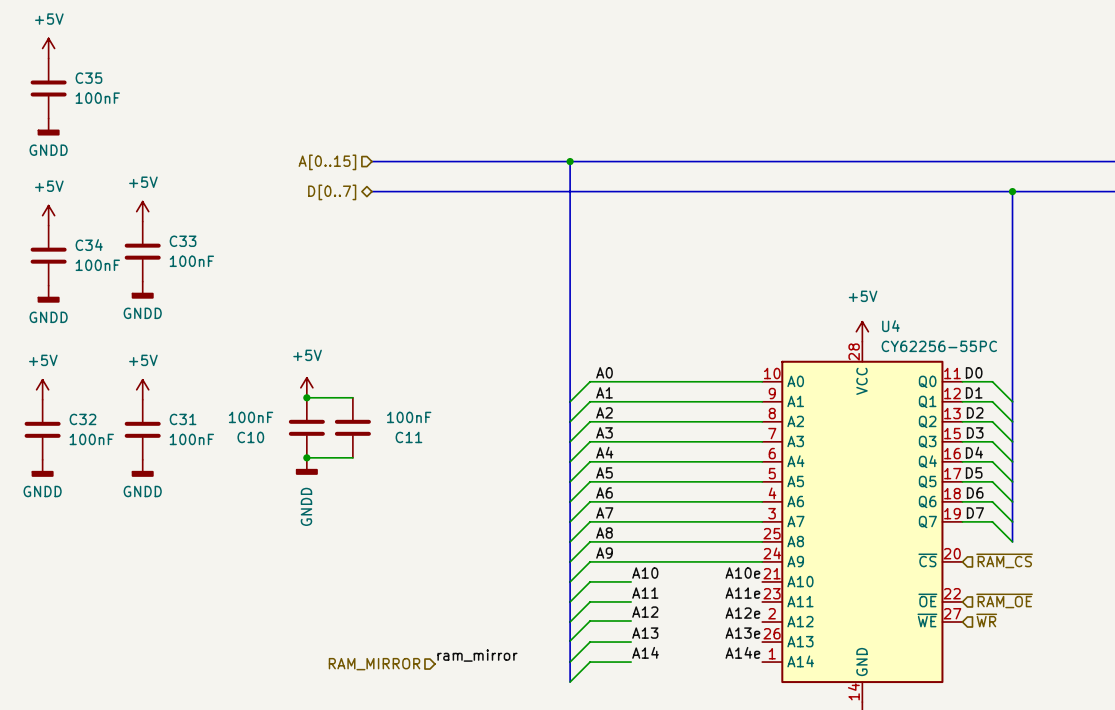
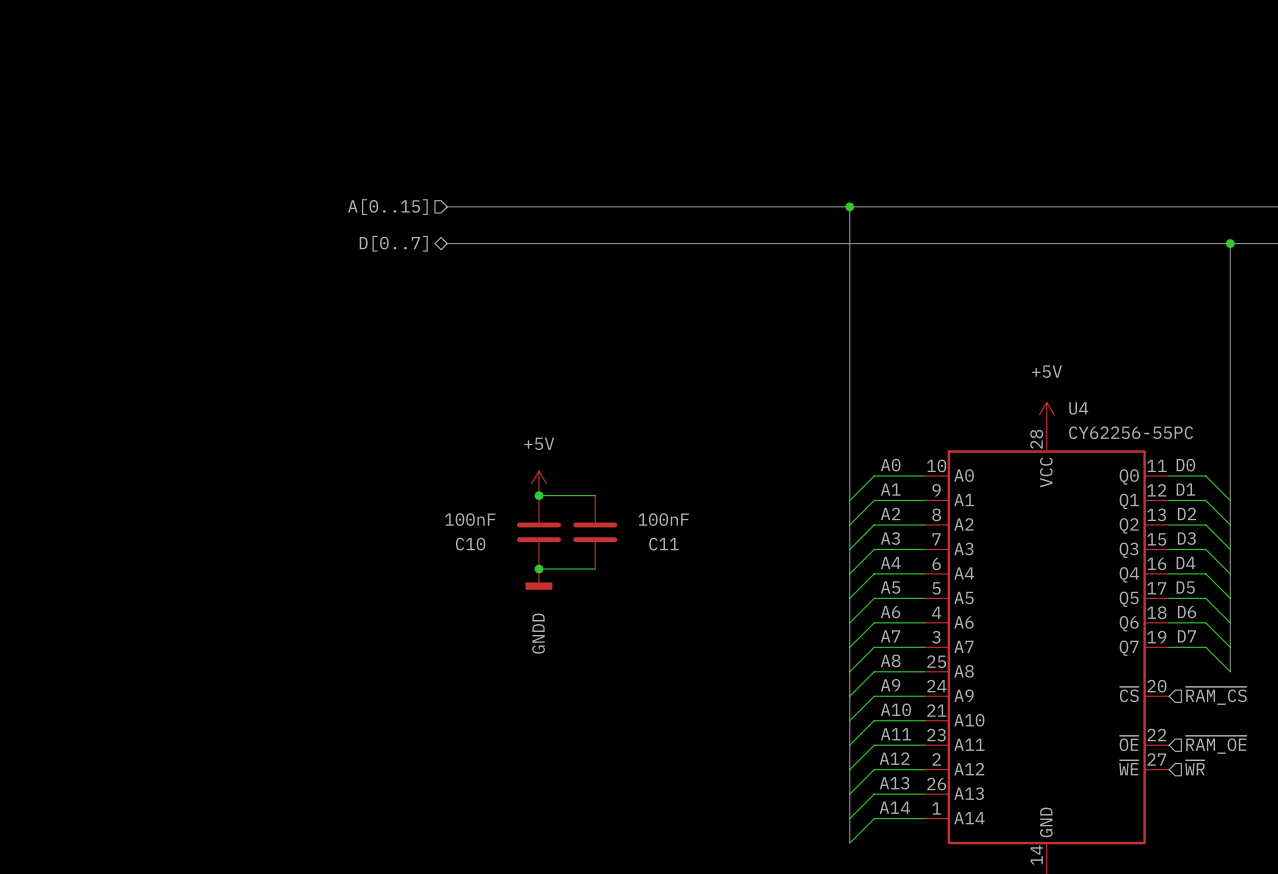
power symbol: +5V (48, 48) -> none
C35: 100nF (48, 88) -> none
power symbol: GNDD (48, 127) -> none
bus: (570, 161) (570, 682) -> (849, 206) (849, 843)
junction: (570, 161) -> none
junction: none -> (849, 206)
power symbol: +5V (142, 211) -> none
power symbol: +5V (48, 215) -> none
C33: 100nF (142, 251) -> none
C34: 100nF (48, 255) -> none
power symbol: GNDD (142, 290) -> none
power symbol: GNDD (48, 294) -> none
label position: A0 (604, 372) -> A0 (890, 465)
wire: (721, 381) (590, 381) (570, 401) -> (874, 476) (849, 500)
power symbol position: +5V (306, 387) -> +5V (539, 483)
power symbol: +5V (42, 389) -> none
power symbol: +5V (142, 389) -> none
label position: A1 (604, 392) -> A1 (890, 489)
wire: (306, 397) (352, 397) -> (539, 495) (595, 495)
junction: (306, 397) -> none
junction: none -> (539, 495)
wire: (721, 401) (590, 401) (570, 421) -> (874, 500) (849, 524)
label position: A2 (604, 412) -> A2 (890, 513)
wire: (721, 421) (590, 421) (570, 441) -> (874, 524) (849, 549)
C10 position: (306, 427) -> (539, 532)
C11 position: (352, 427) -> (595, 532)
C32: 100nF (42, 429) -> none
C31: 100nF (142, 429) -> none
label position: A3 (604, 432) -> A3 (890, 538)
wire: (590, 441) (721, 441) -> (849, 573) (874, 549)
wire: (590, 441) (570, 461) -> none
label position: A4 (604, 452) -> A4 (890, 562)
wire: (306, 457) (352, 457) -> (539, 569) (595, 569)
junction: (306, 457) -> none
junction: none -> (539, 569)
wire: (721, 461) (590, 461) (570, 481) -> (874, 573) (849, 598)
power symbol position: GNDD (306, 466) -> GNDD (539, 579)
power symbol: GNDD (42, 468) -> none
power symbol: GNDD (142, 468) -> none
label position: A5 (604, 472) -> A5 (890, 587)
wire: (590, 481) (721, 481) -> (849, 622) (874, 598)
wire: (590, 481) (570, 501) -> none
label position: A6 (604, 492) -> A6 (890, 612)
wire: (721, 501) (590, 501) (570, 521) -> (874, 622) (849, 647)
label position: A7 (604, 512) -> A7 (890, 636)
wire: (721, 521) (590, 521) (570, 541) -> (874, 647) (849, 671)
label position: A8 (604, 532) -> A8 (890, 660)
wire: (721, 541) (590, 541) (570, 561) -> (874, 671) (849, 696)
label position: A9 (604, 553) -> A9 (890, 685)
wire: (721, 561) (590, 561) (570, 581) -> (874, 696) (849, 720)
label position: A10 (645, 573) -> A10 (895, 709)
label: A10e (742, 573) -> none
wire: (631, 581) (590, 581) (570, 601) -> (924, 720) (874, 720) (849, 745)
label position: A11 (645, 593) -> A11 (896, 734)
label: A11e (742, 593) -> none
wire: (631, 601) (590, 601) (570, 622) -> (924, 745) (874, 745) (849, 769)
label position: A12 (645, 612) -> A12 (894, 758)
label: A12e (742, 613) -> none
wire: (631, 621) (590, 621) (570, 641) -> (924, 769) (874, 769) (849, 794)
label position: A13 (645, 633) -> A13 (894, 783)
label: A13e (742, 633) -> none
wire: (631, 642) (590, 642) (570, 662) -> (924, 794) (874, 794) (849, 818)
label position: A14 (645, 652) -> A14 (894, 807)
label: A14e (742, 652) -> none
label: ram_mirror (477, 655) -> none
wire: (631, 662) (590, 662) (570, 682) -> (924, 818) (874, 818) (849, 843)
hierarchical label: RAM_MIRROR (374, 664) -> none

